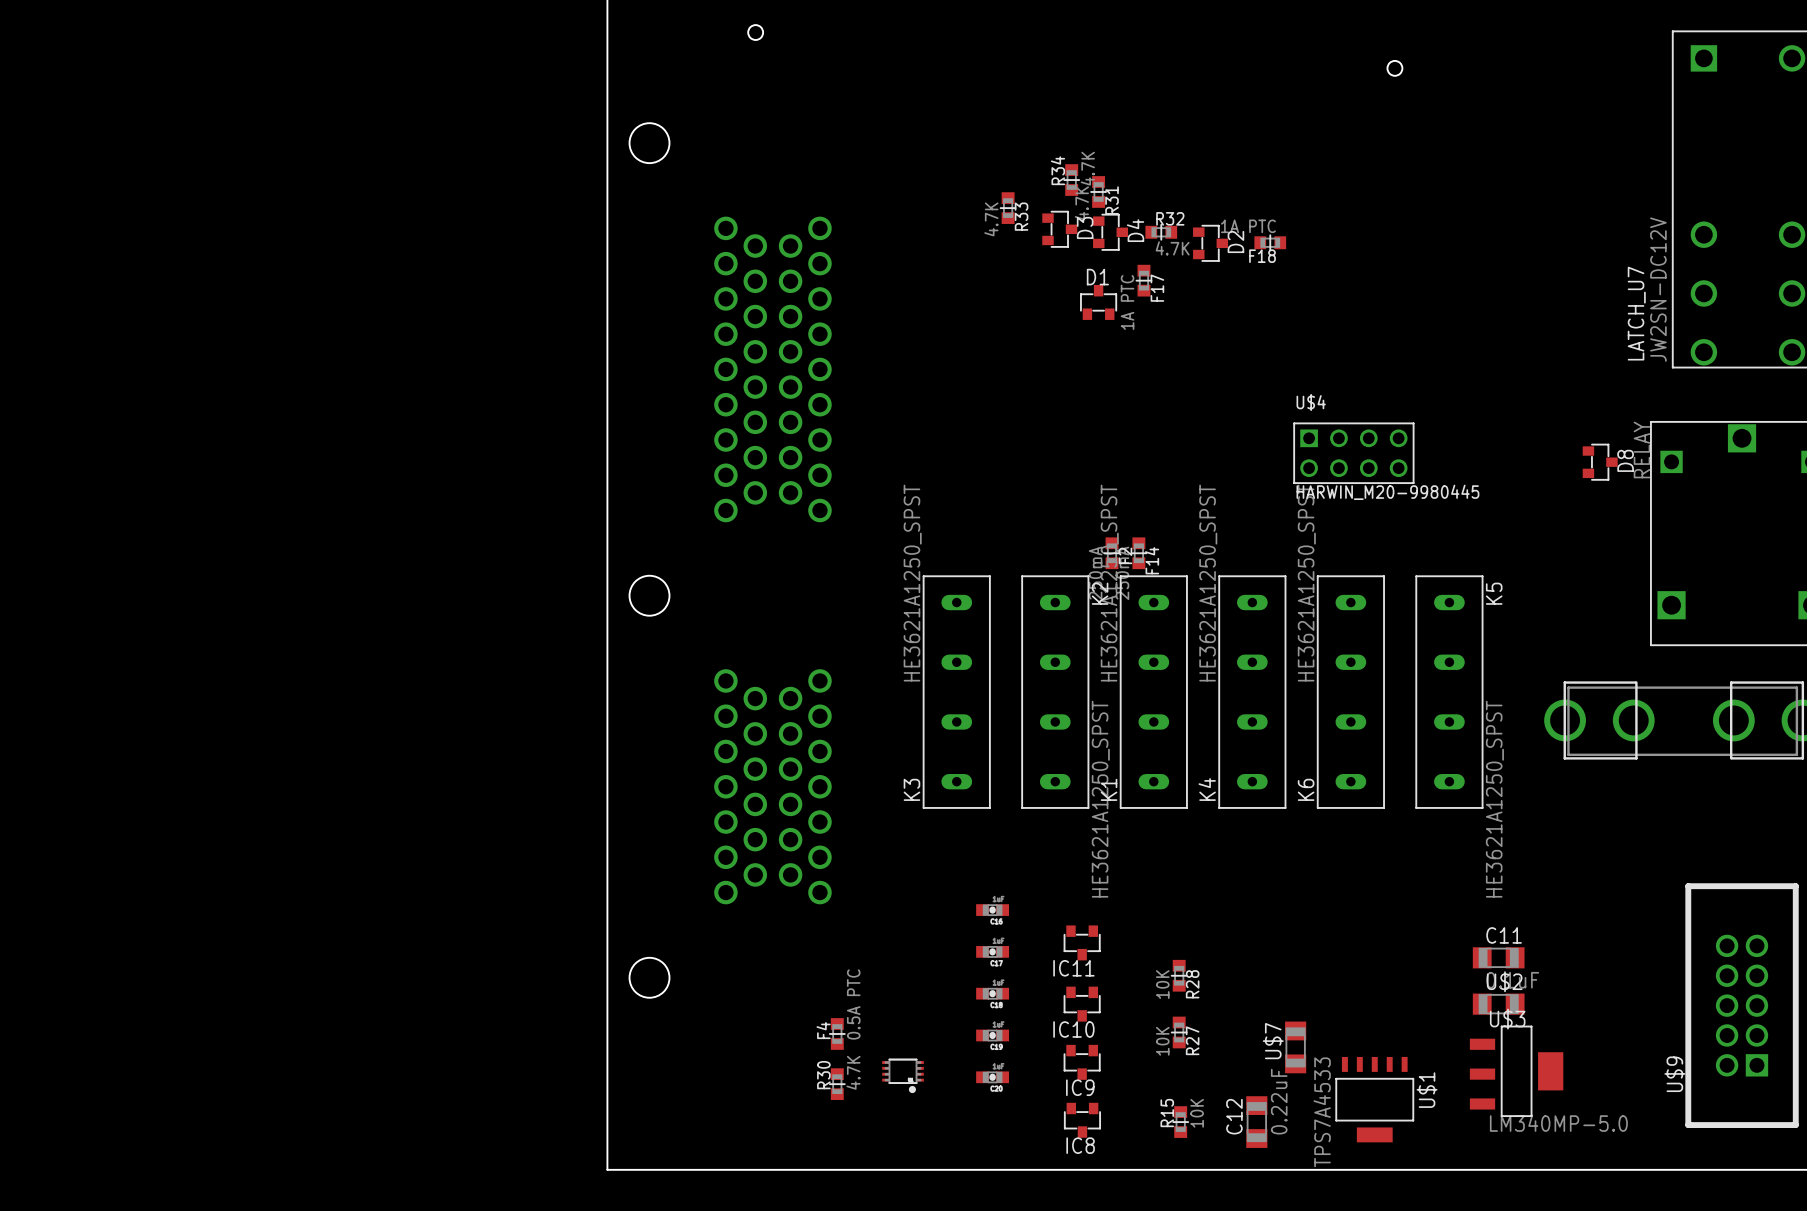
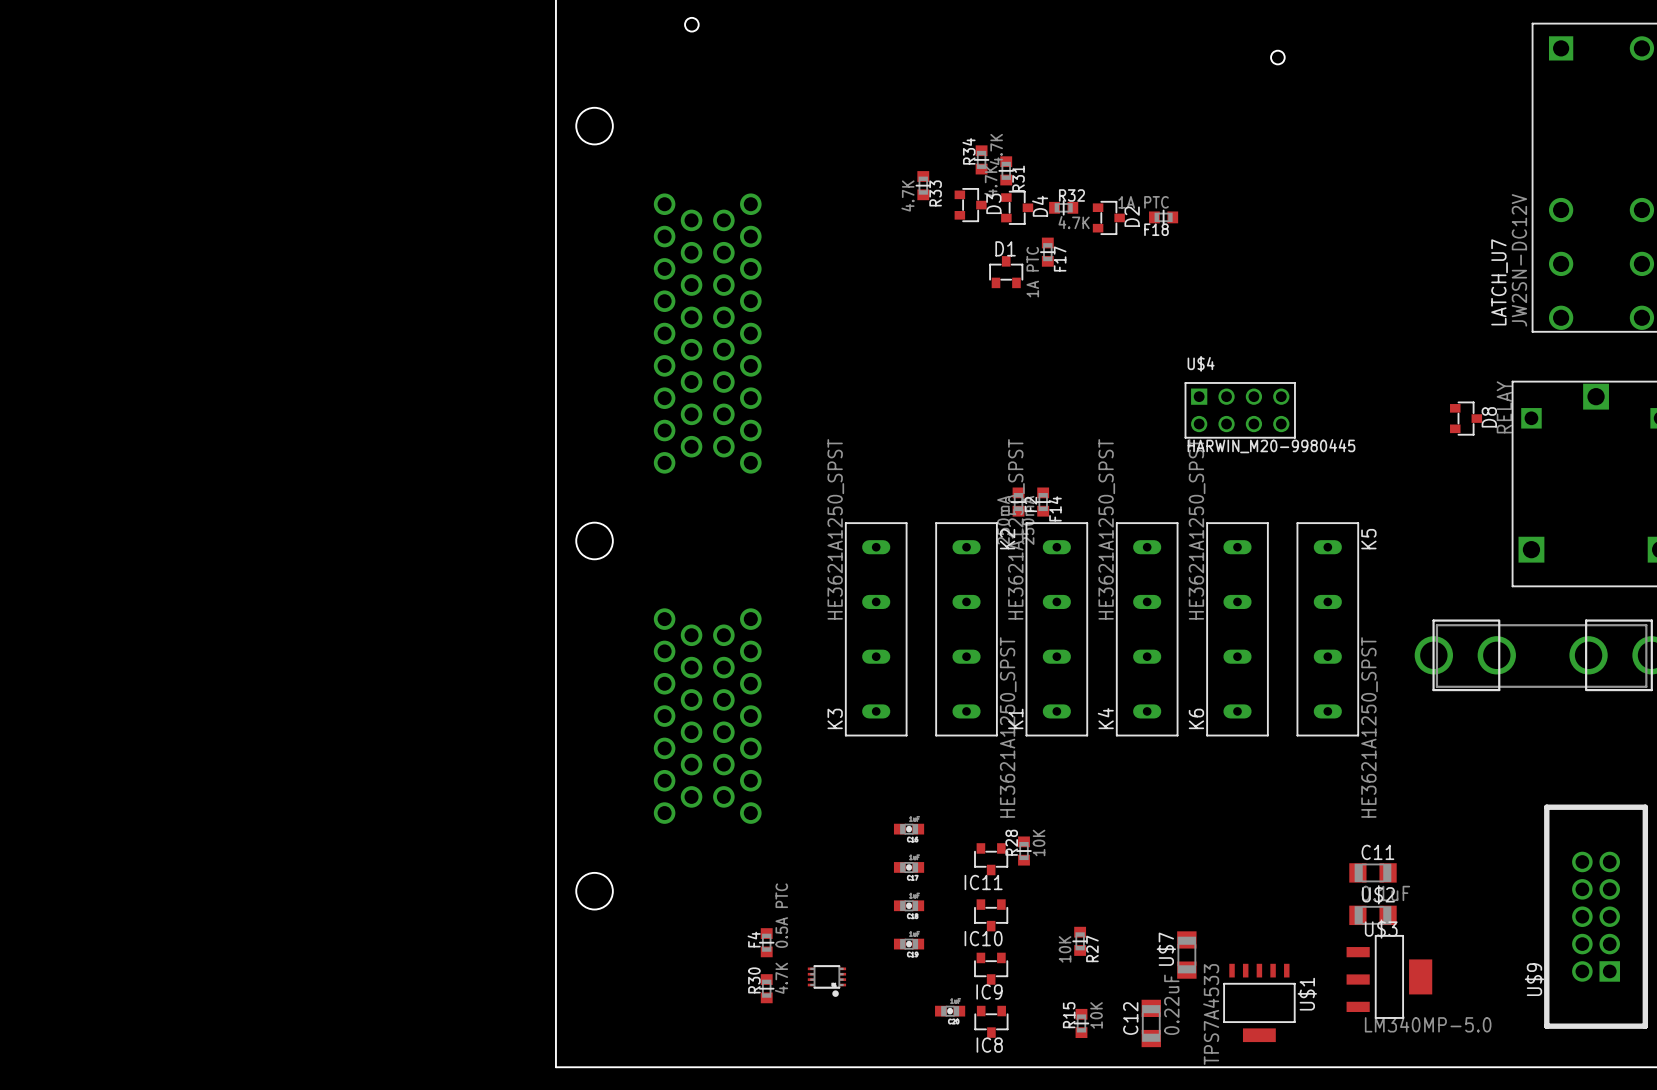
R28 position: (1179, 975) -> (1024, 851)
R28 value position: 10K (1162, 984) -> 10K (1039, 842)
R28 name position: R28 (1192, 984) -> R28 (1011, 842)
part position: (992, 1077) -> (950, 1011)

